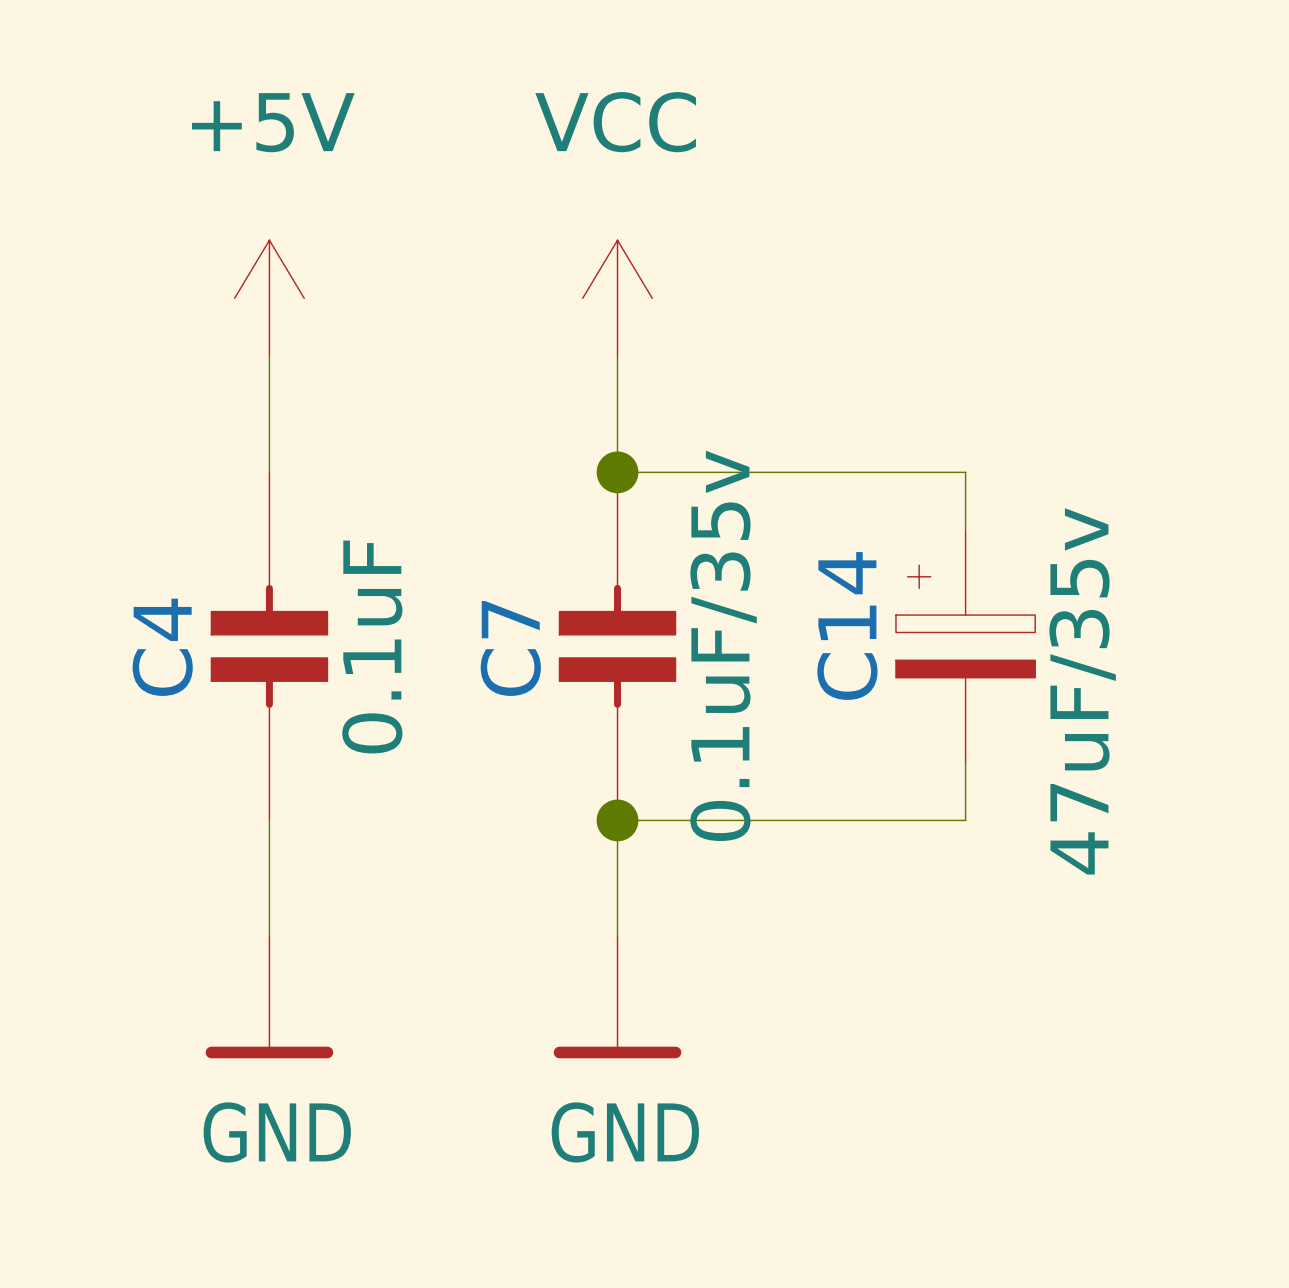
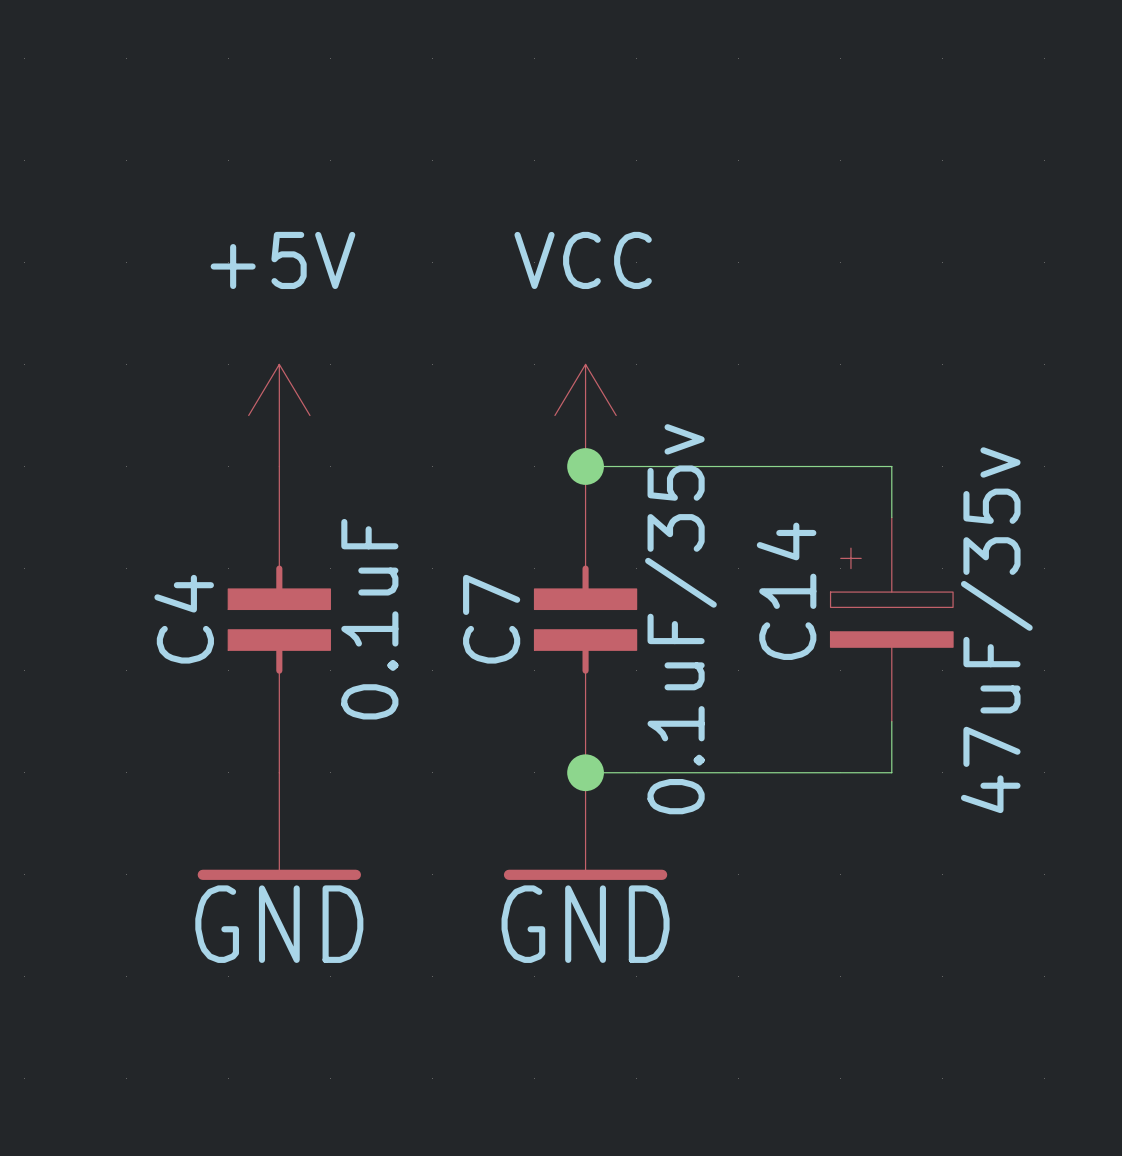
power symbol position: +5V (269, 298) -> +5V (279, 415)
power symbol position: VCC (617, 298) -> VCC (585, 415)
power symbol: none -> GND (279, 826)
power symbol: none -> GND (585, 826)
power symbol: GND (269, 997) -> none
power symbol: GND (617, 997) -> none

